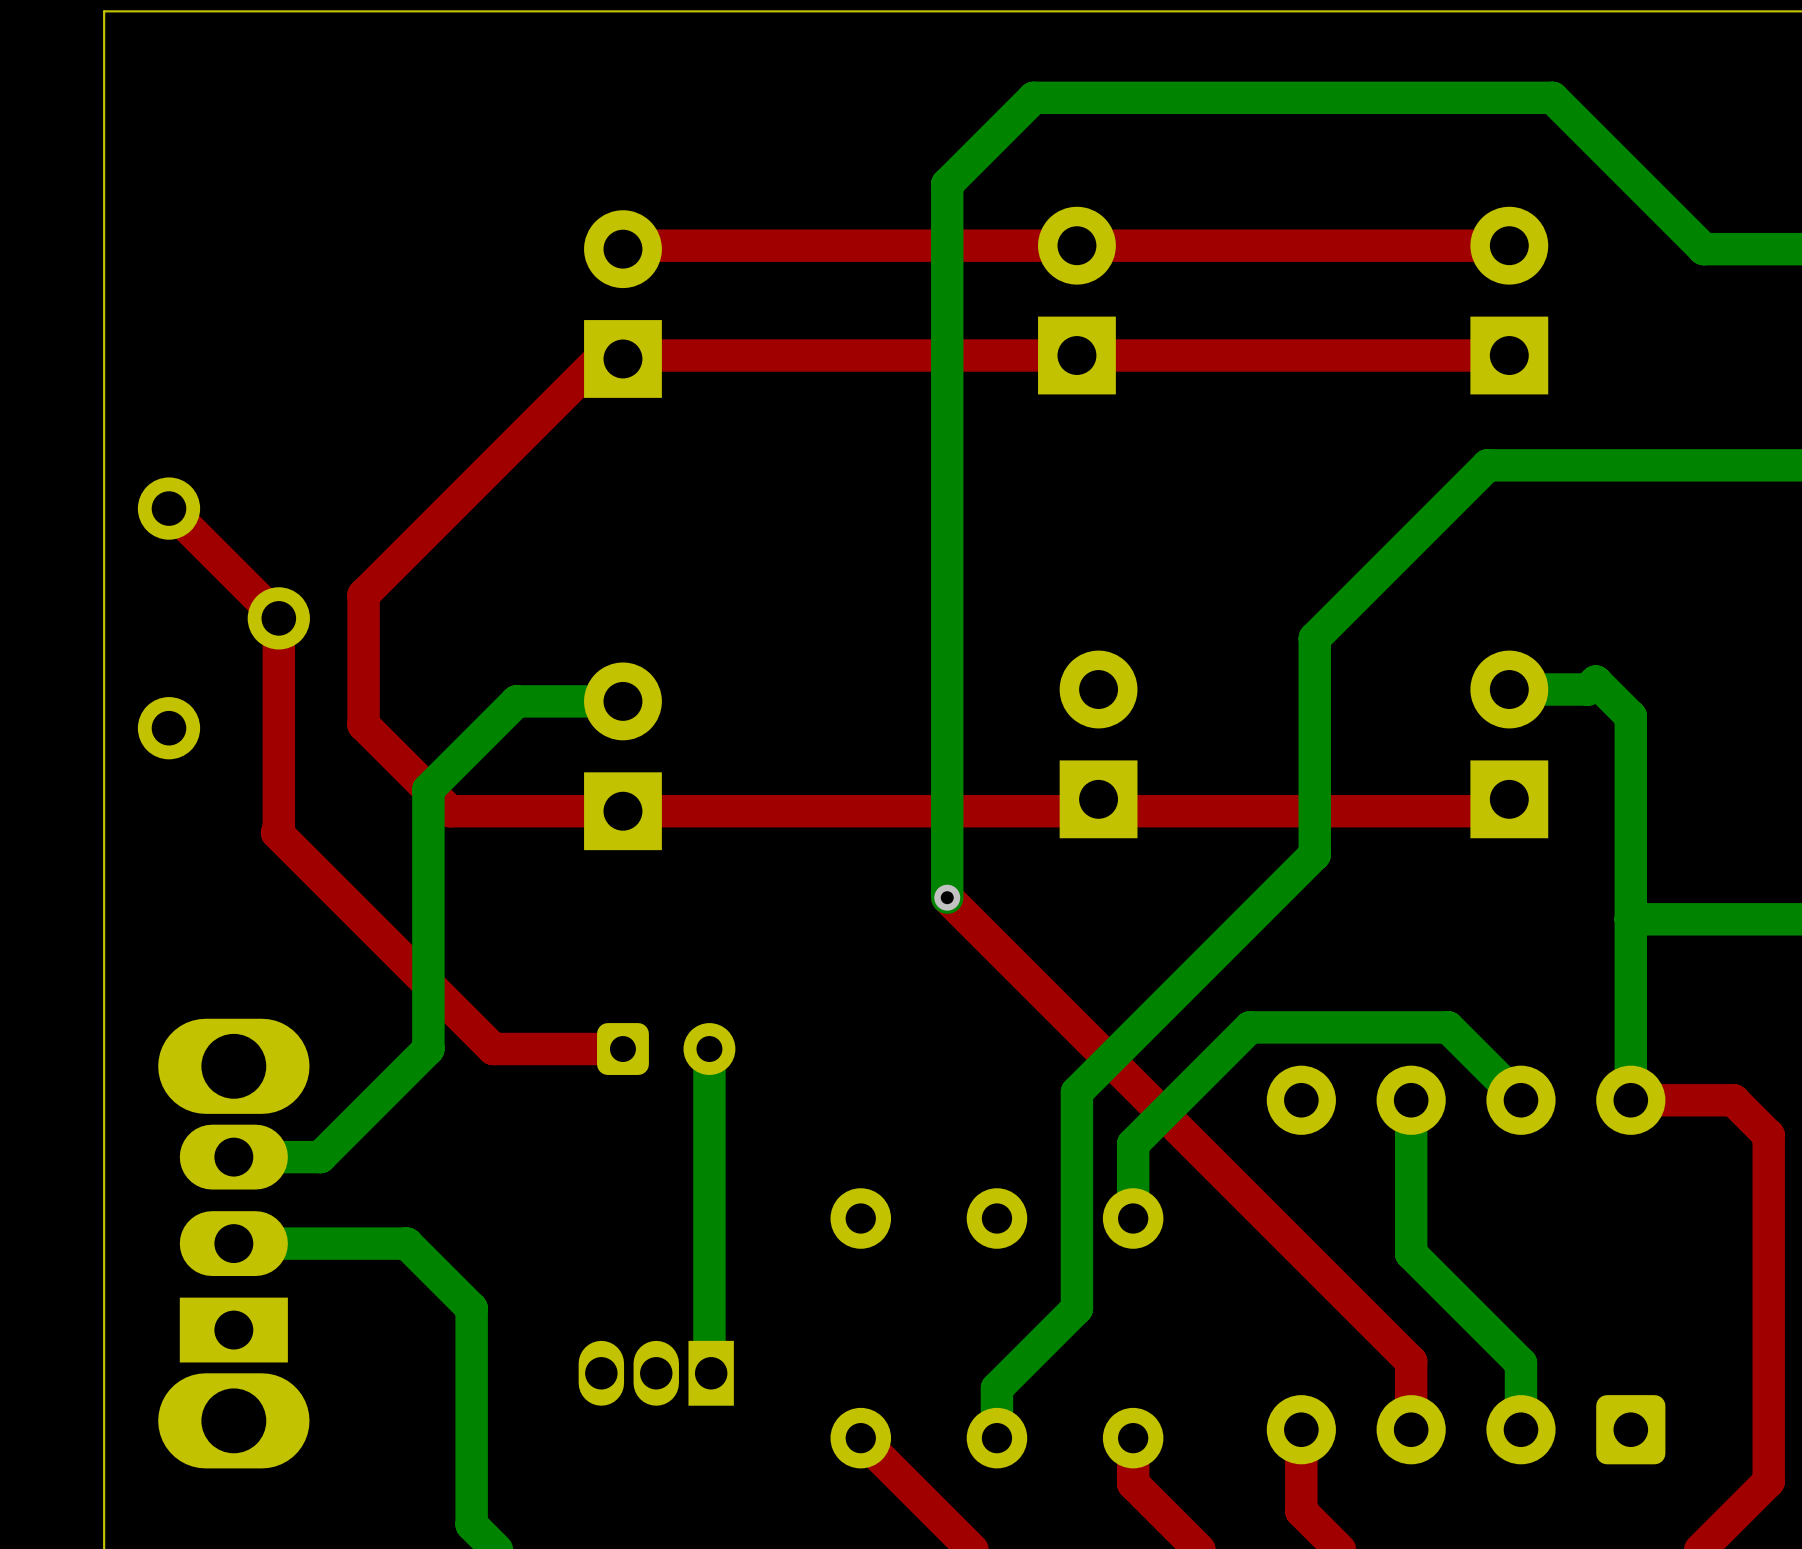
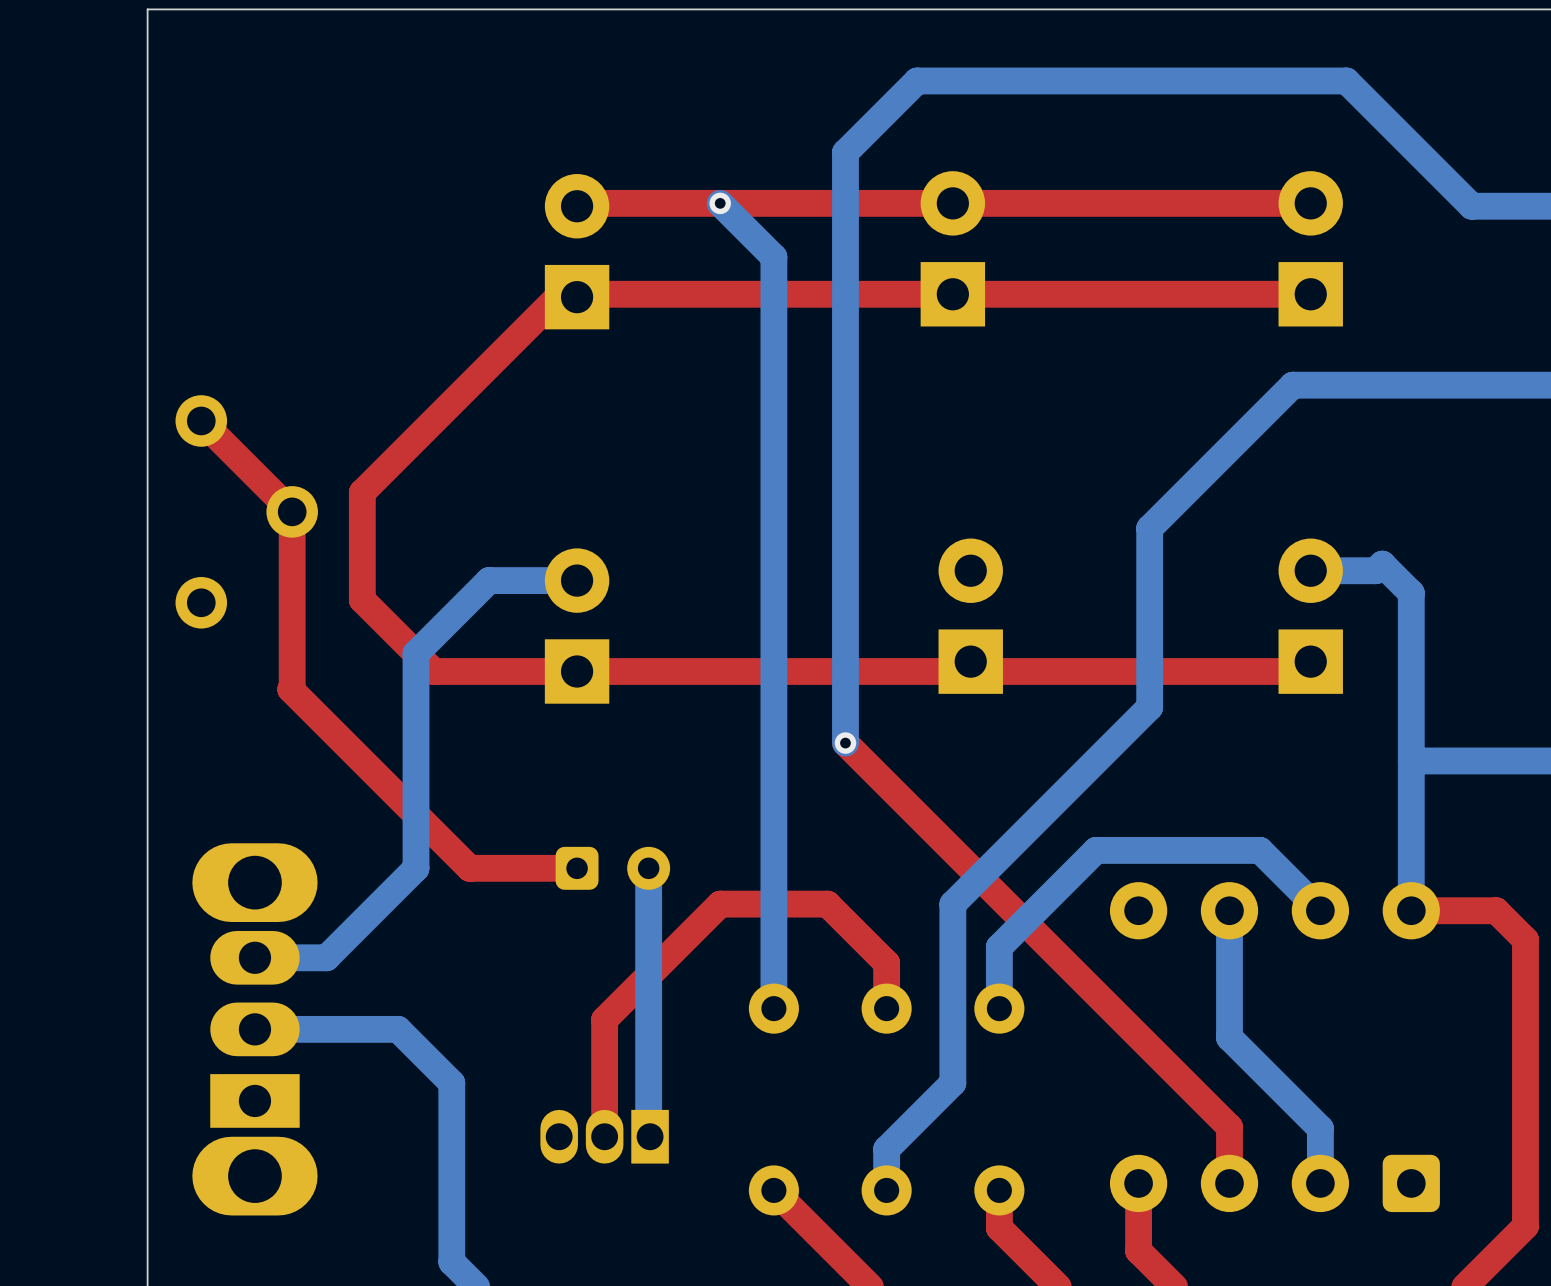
bottom track: none -> (720, 203) (773, 257) (773, 1008)
via: none -> (720, 203)
top track: none -> (886, 1008) (886, 963) (827, 904) (720, 904) (604, 1019) (604, 1136)

